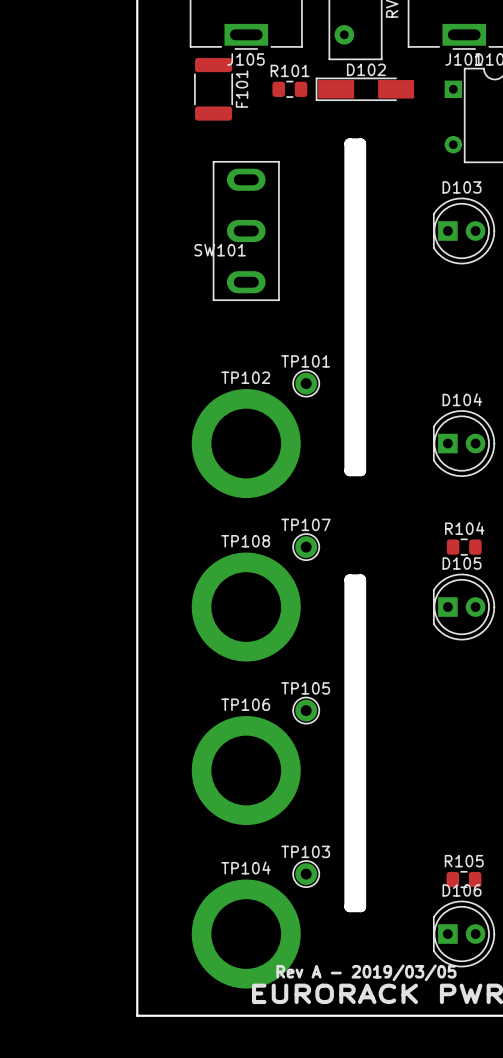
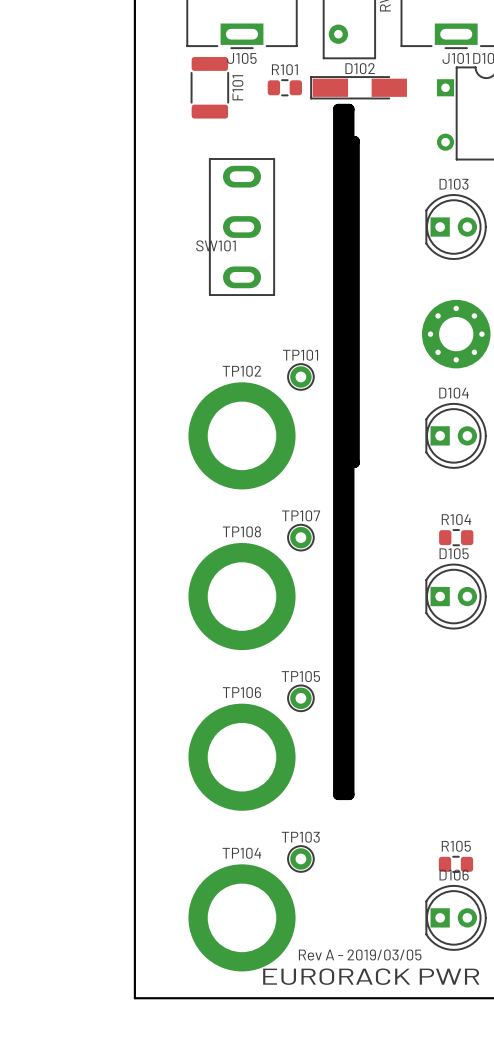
board edge: none -> (338, 109) (349, 109) (349, 794) (338, 794) (338, 109)
part: none -> (456, 334)
board edge: (349, 579) (360, 579) (360, 906) (349, 906) (349, 579) -> none

